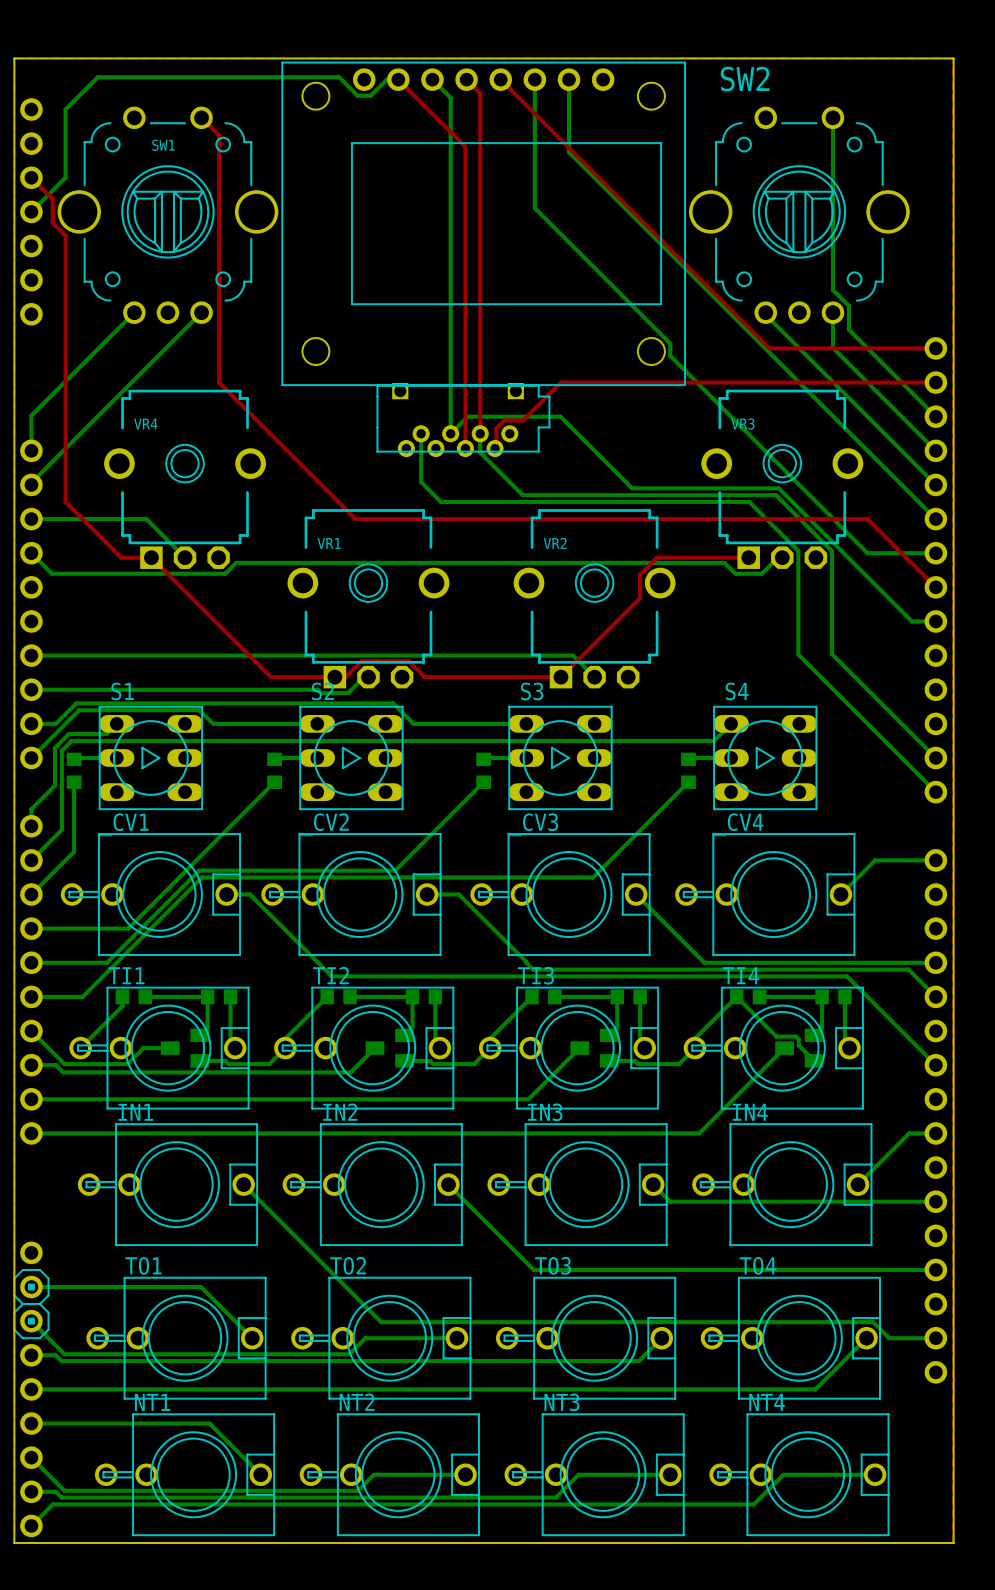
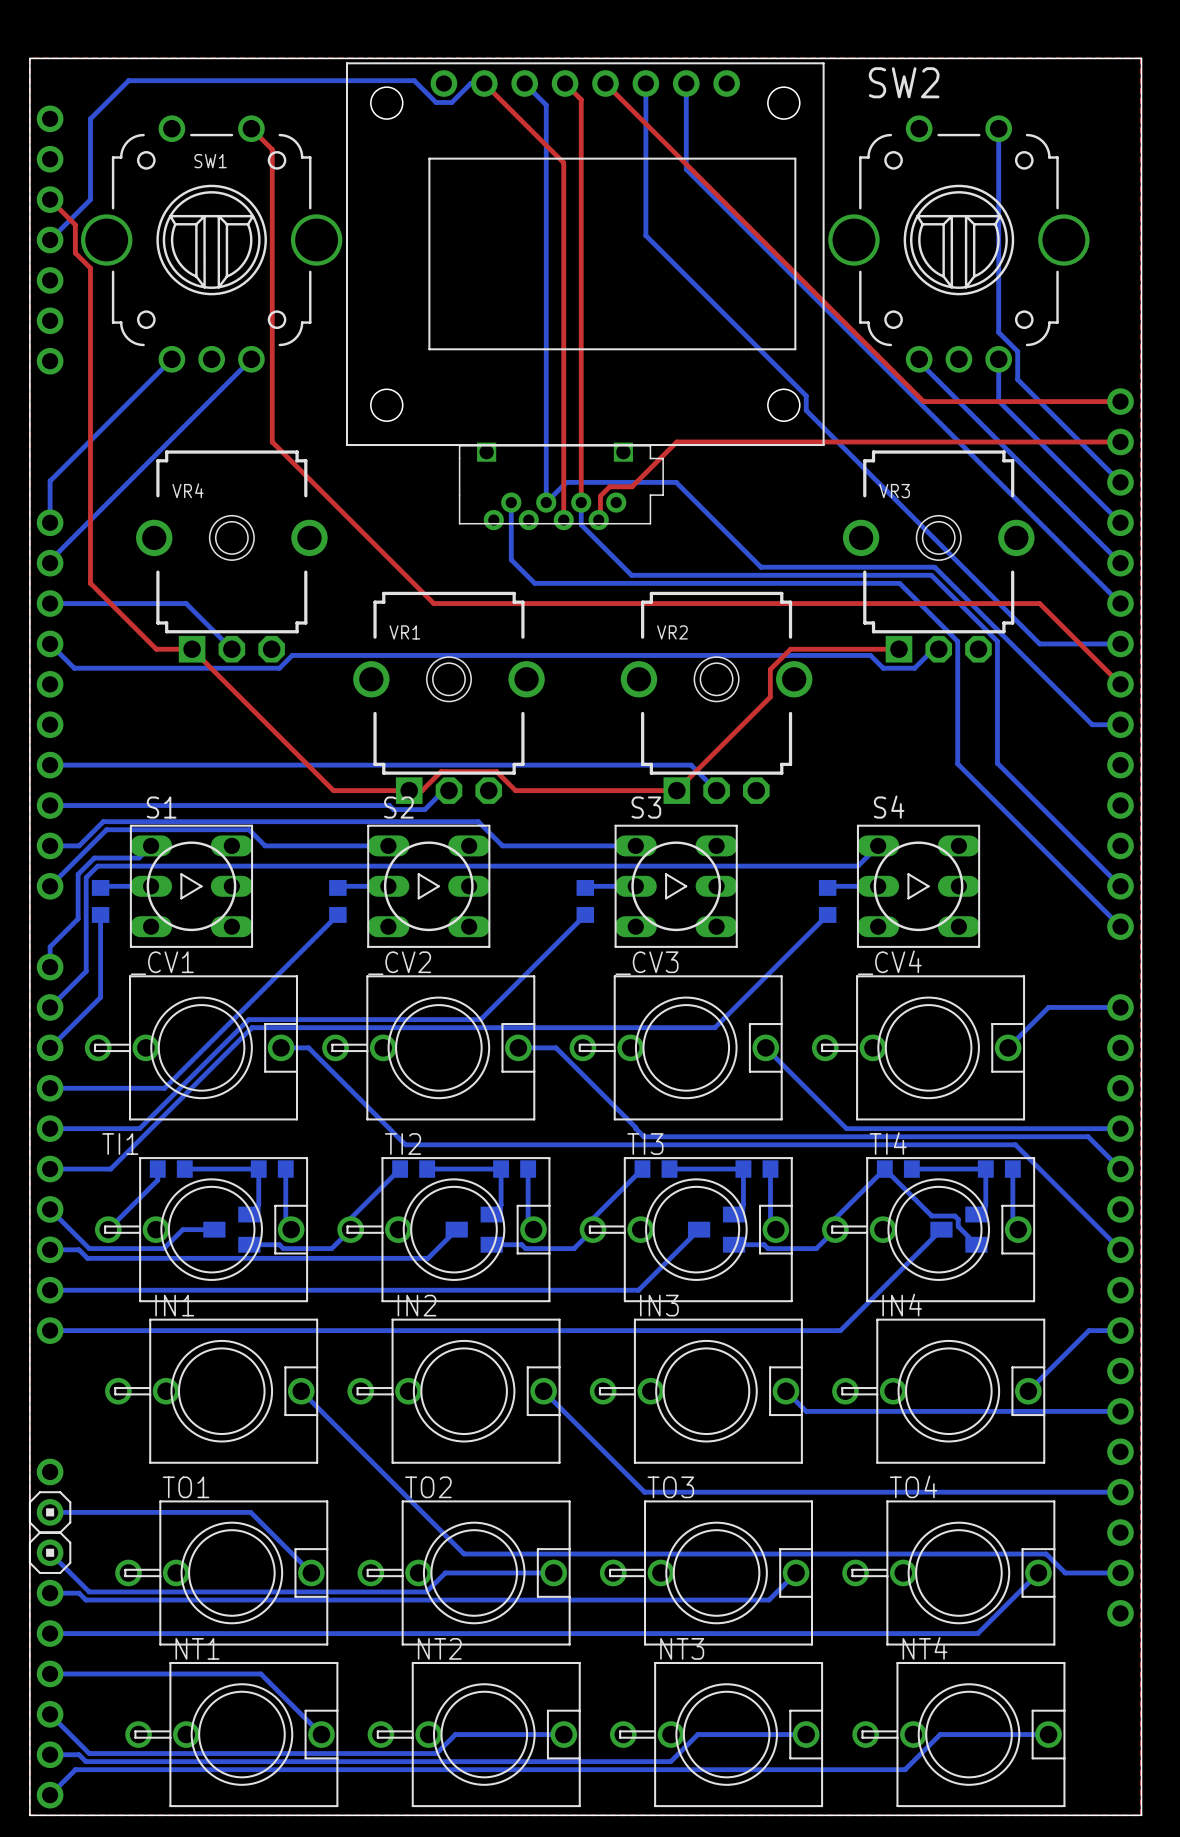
TI1 name position: TI1 (126, 975) -> TI1 (120, 1144)

